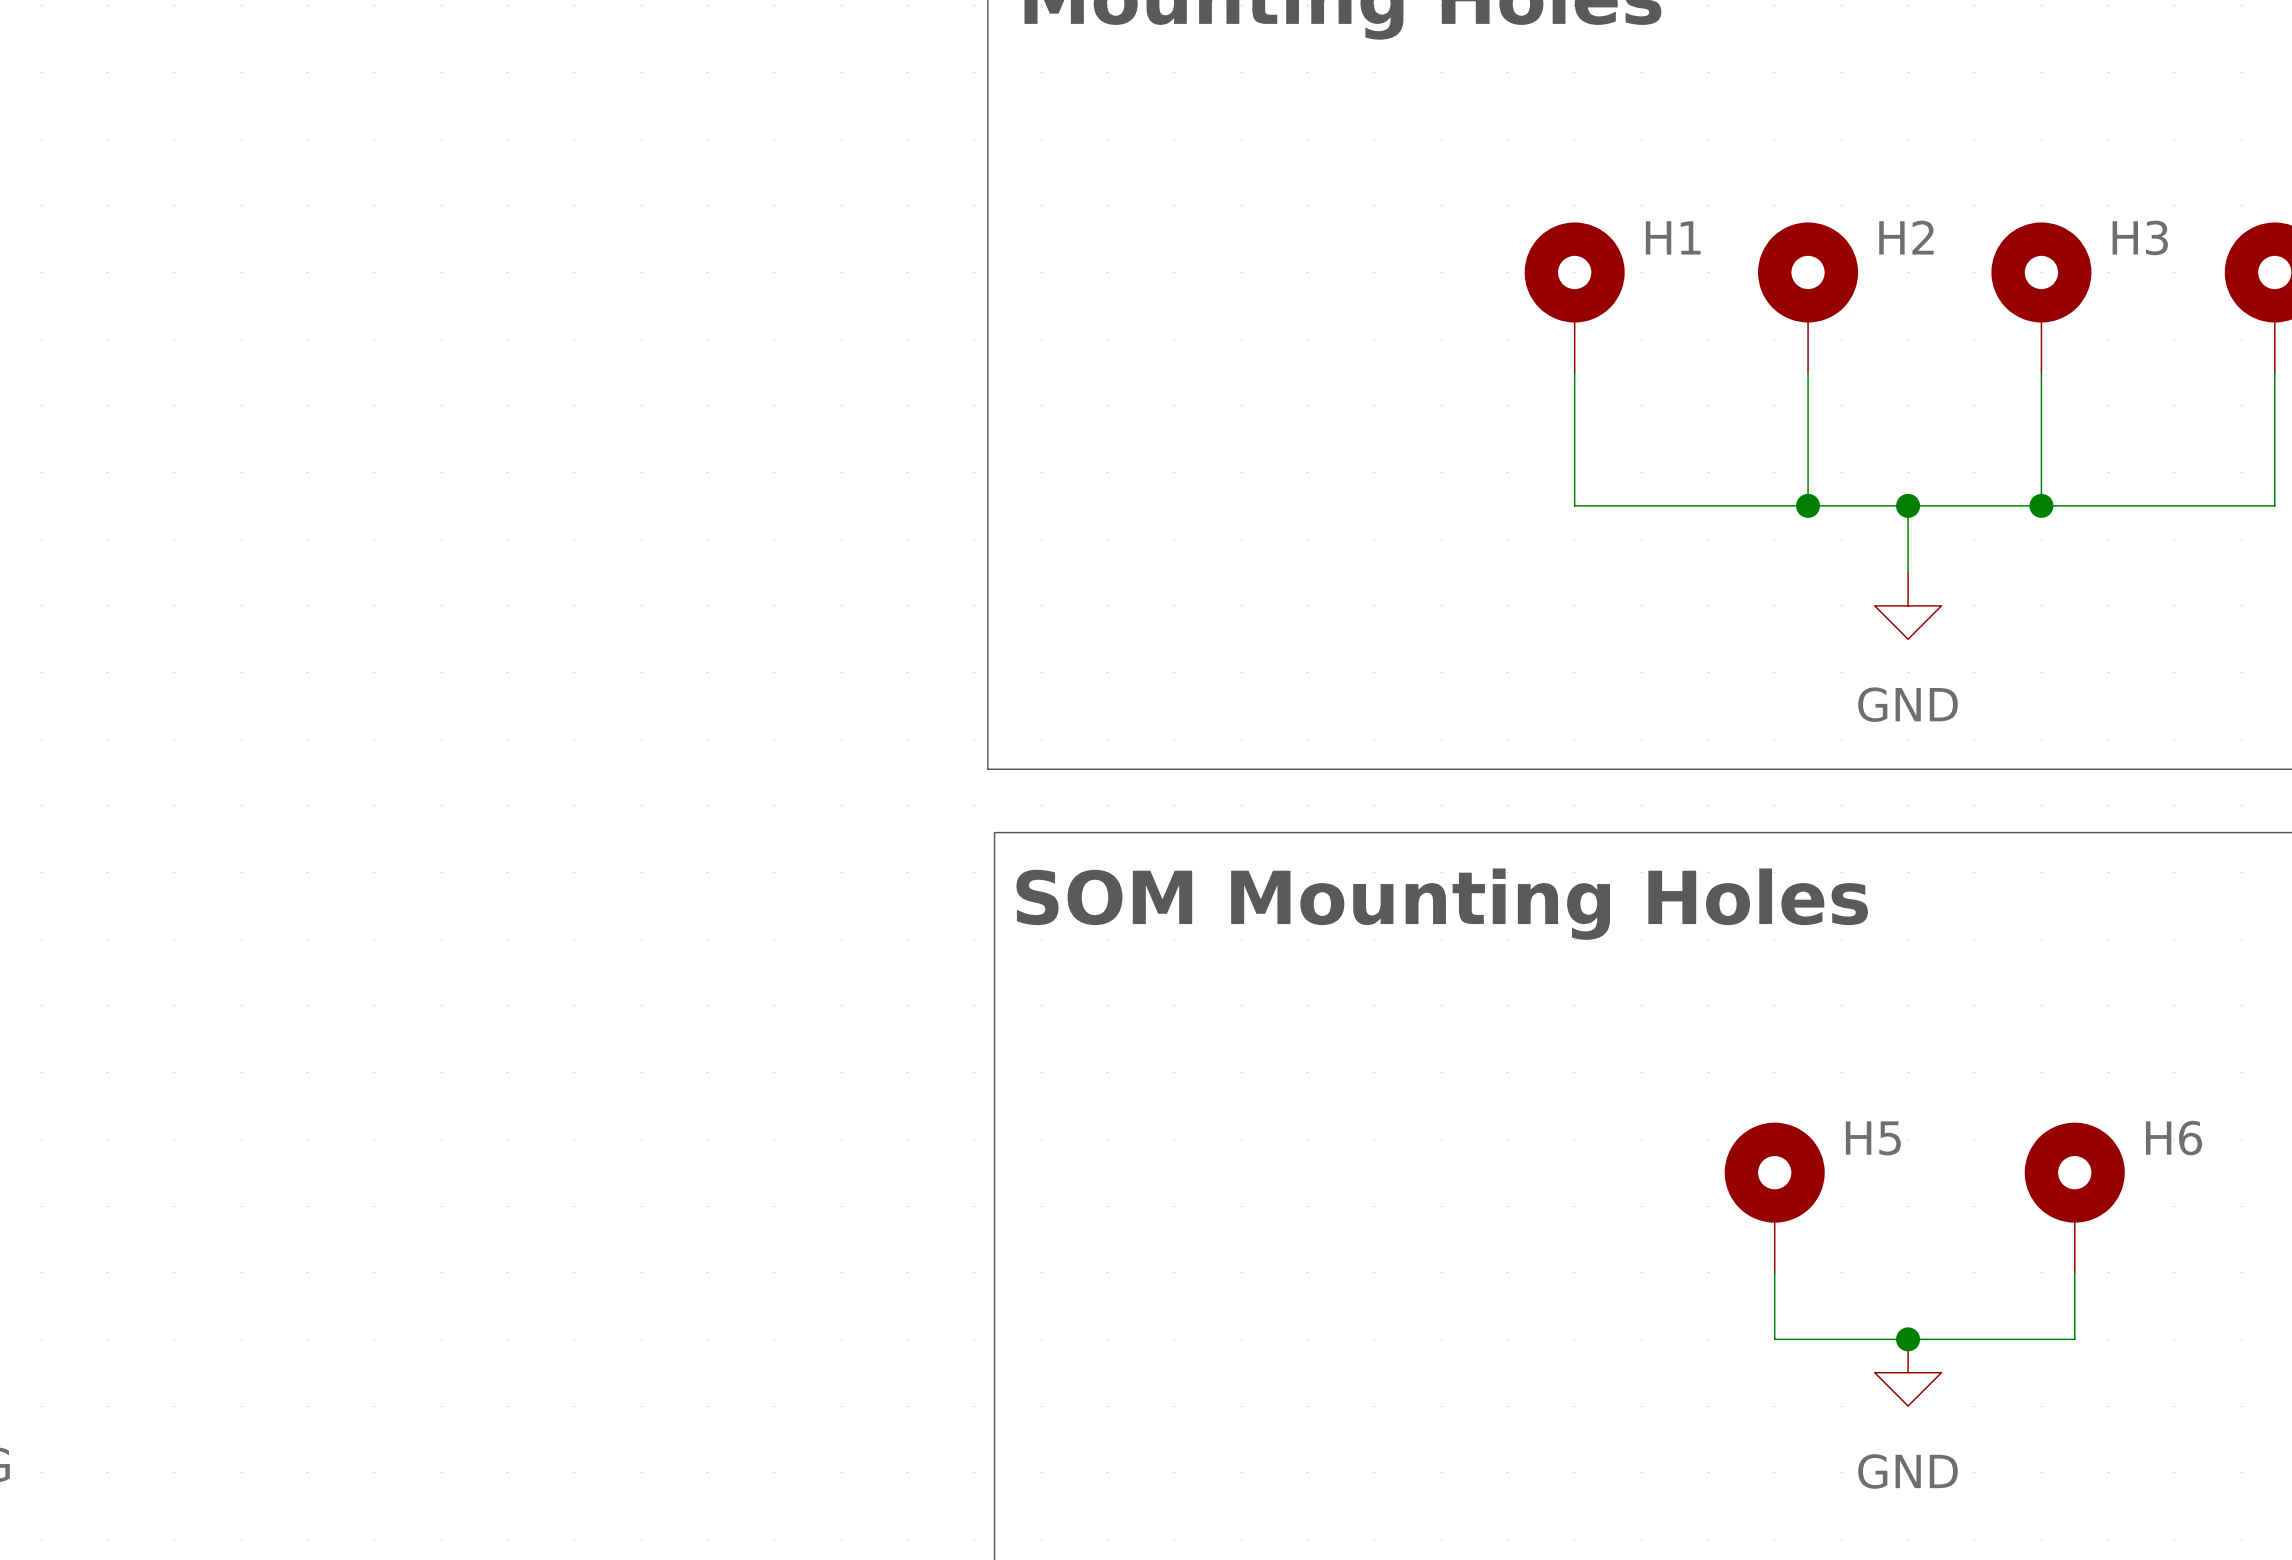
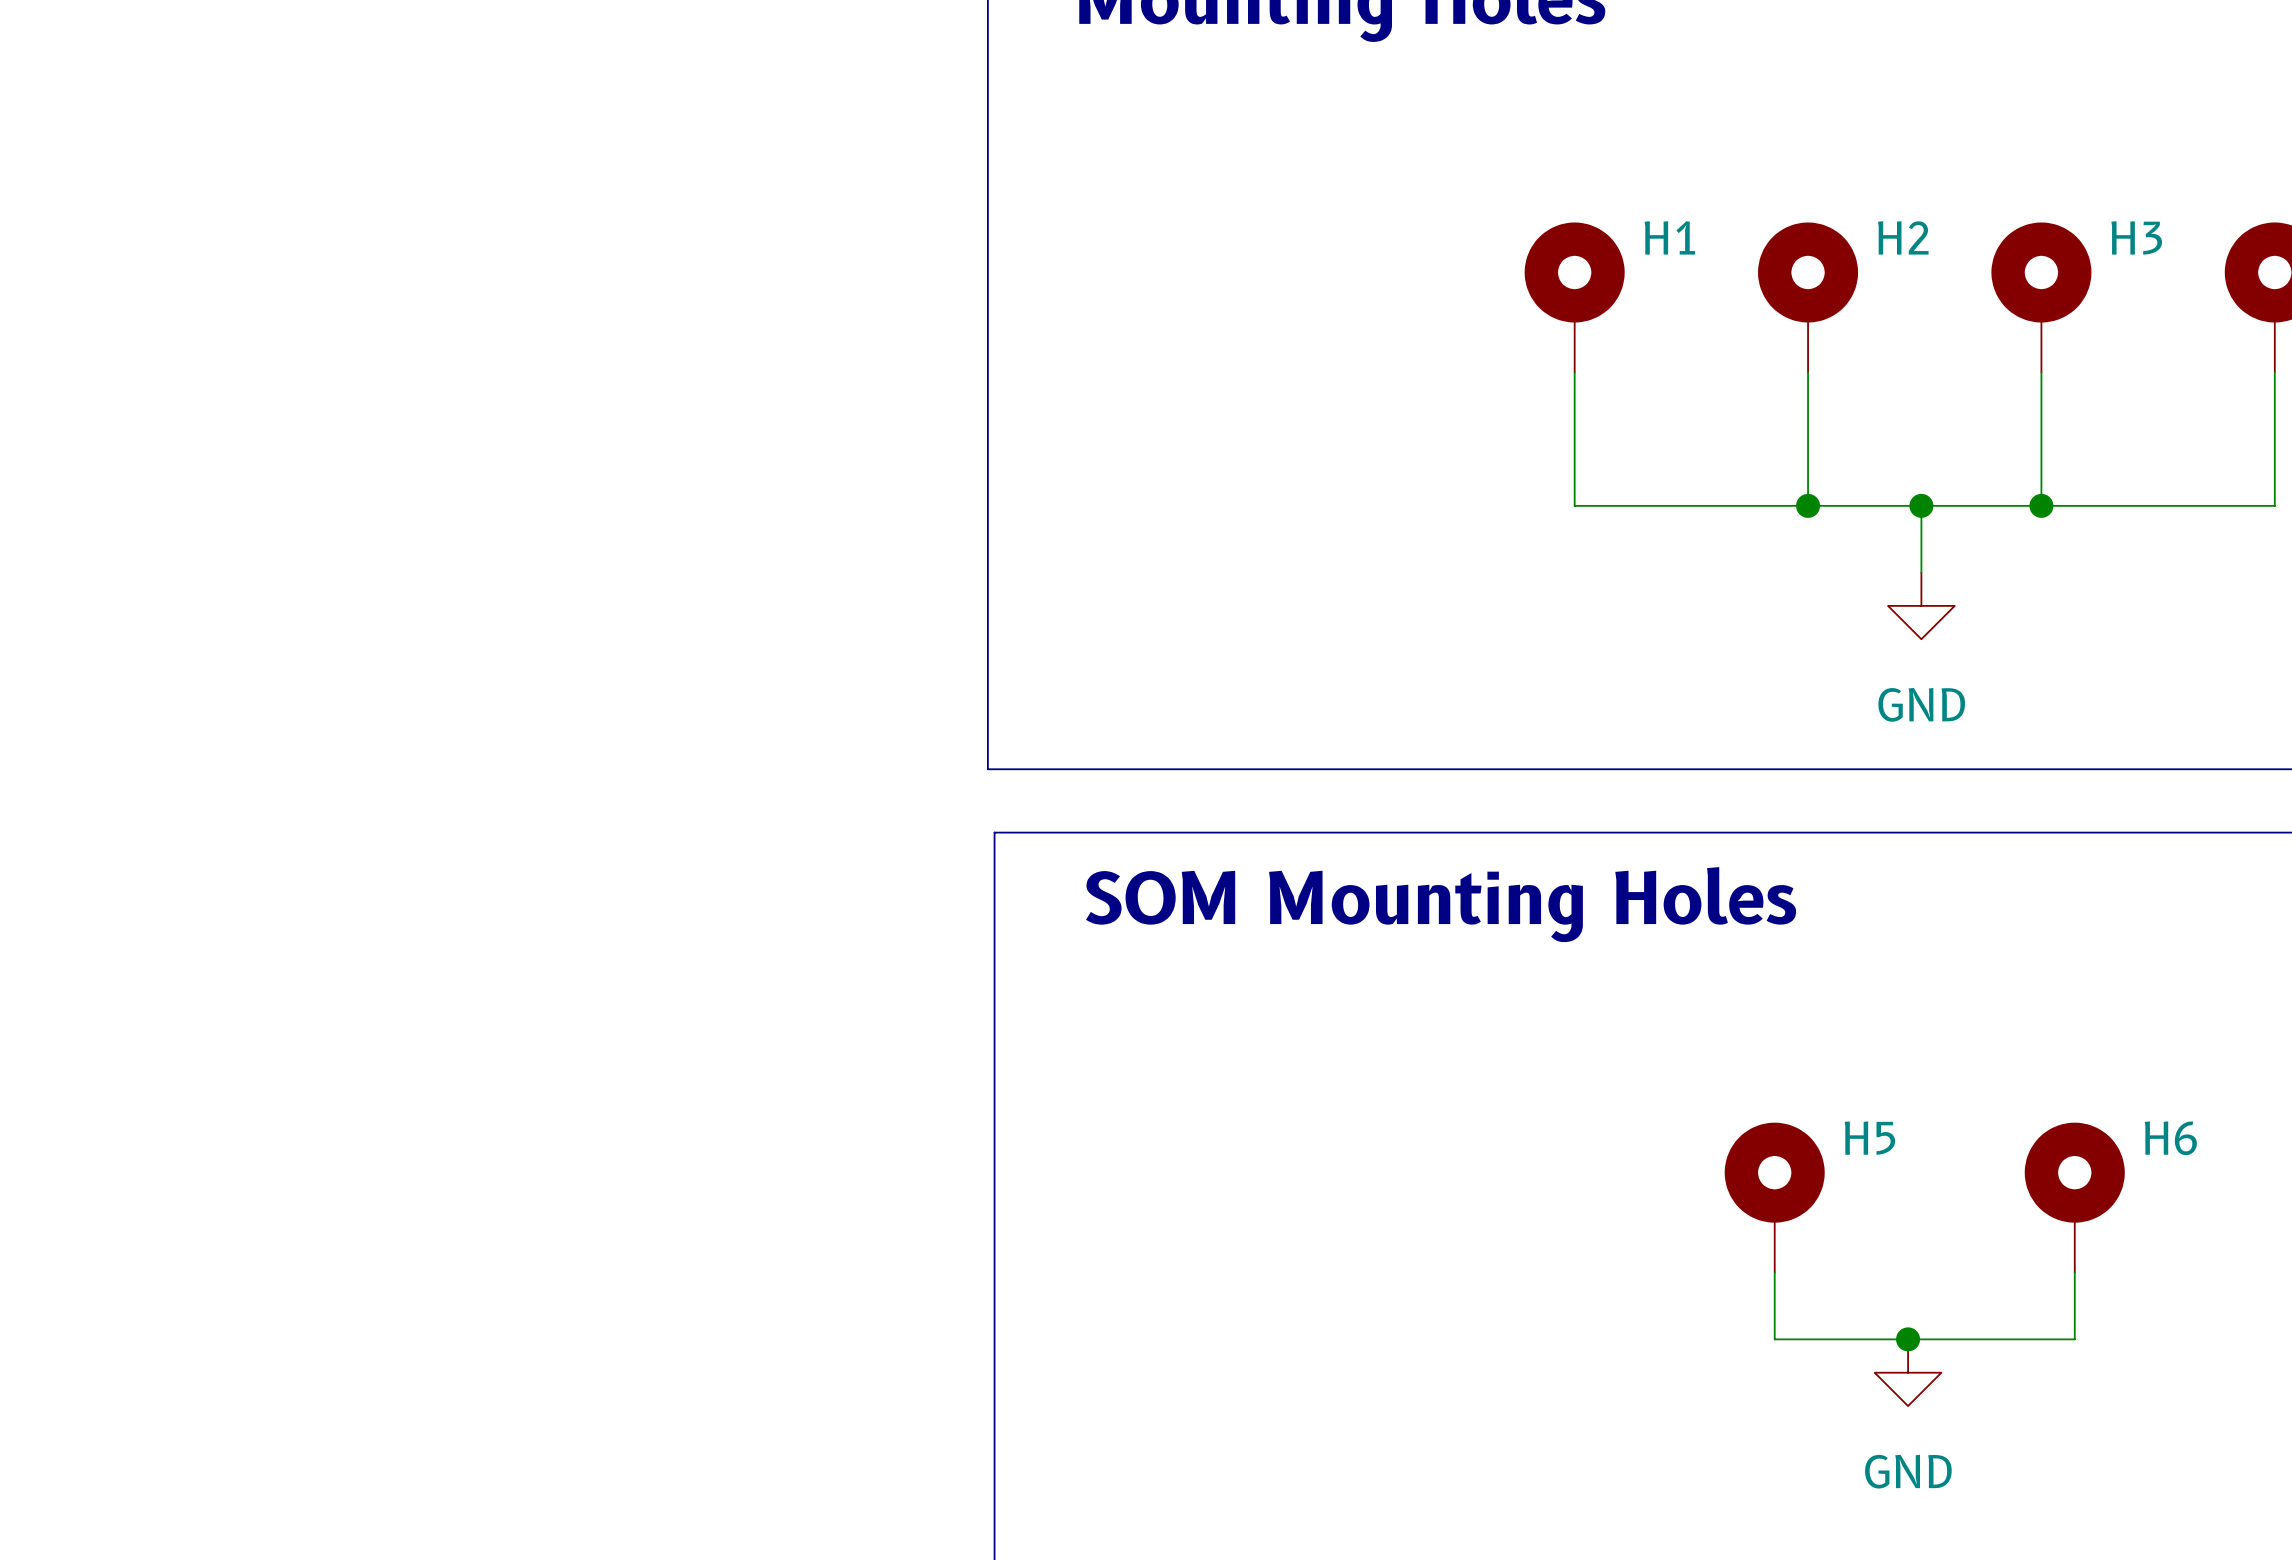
wire: (1908, 505) (1908, 572) -> (1921, 505) (1921, 572)
junction position: (1908, 505) -> (1921, 505)
power symbol position: GND (1908, 605) -> GND (1921, 605)

